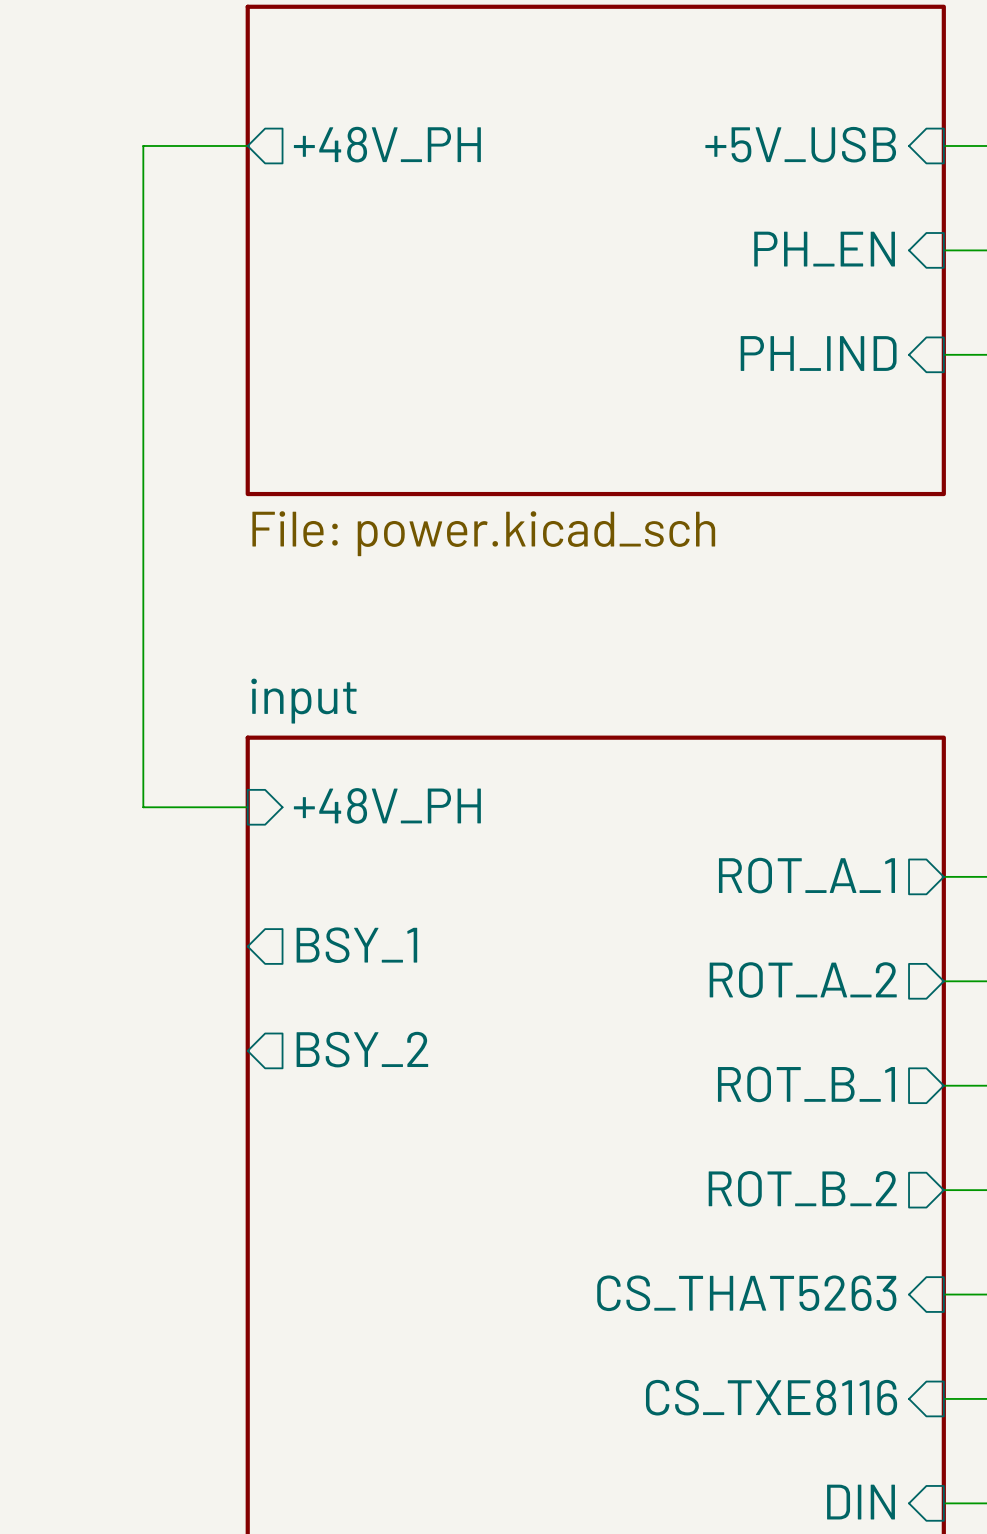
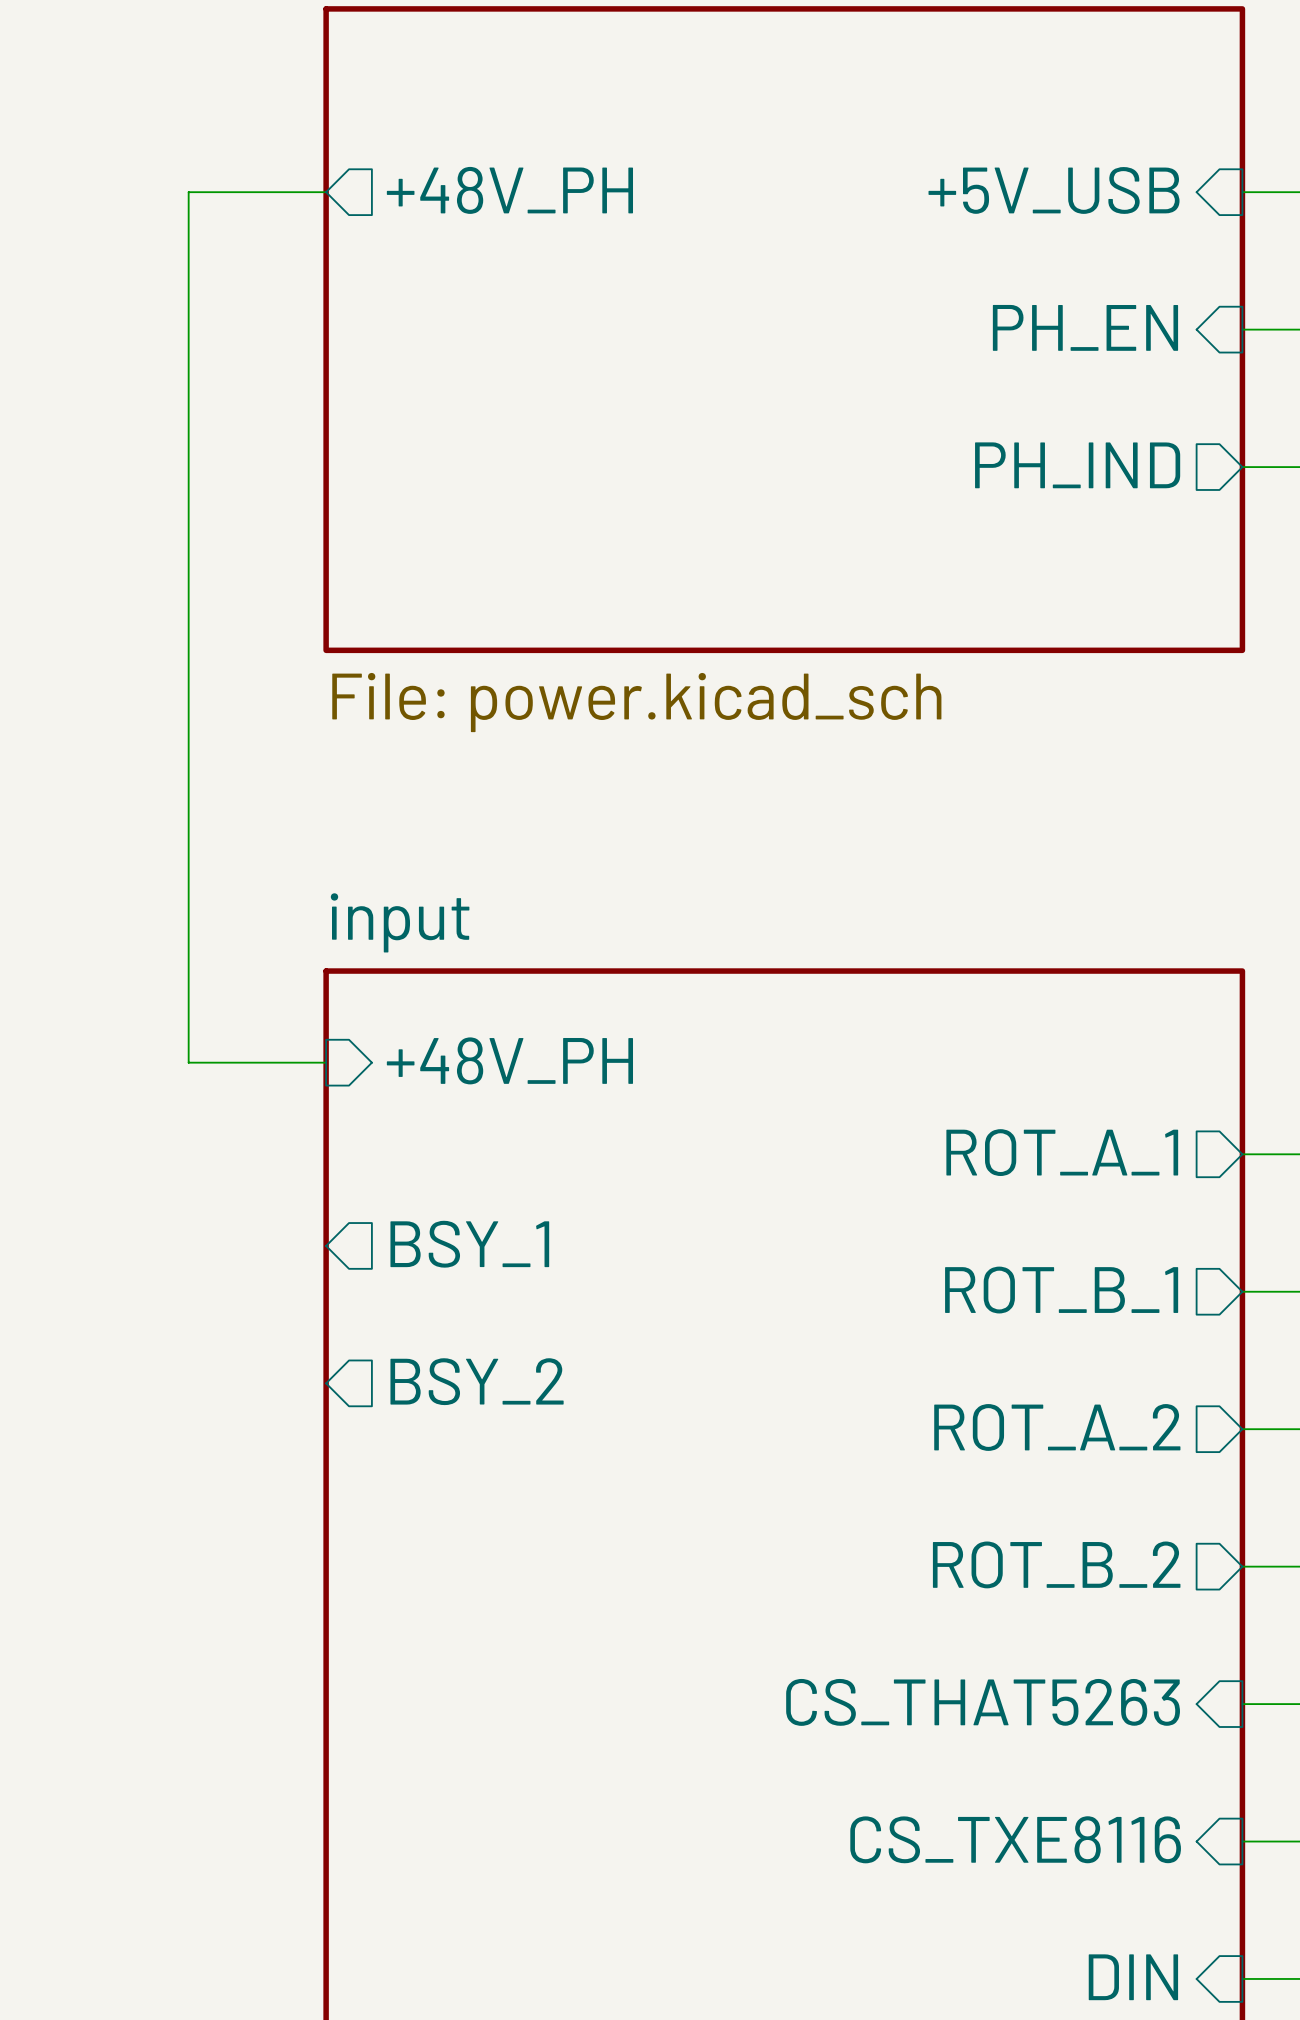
sheet pin shape: input (818, 353) -> output (1077, 465)
sheet pin: ROT_A_2 (803, 980) -> ROT_B_1 (1061, 1290)
sheet pin: ROT_B_1 (806, 1084) -> ROT_A_2 (1057, 1427)

